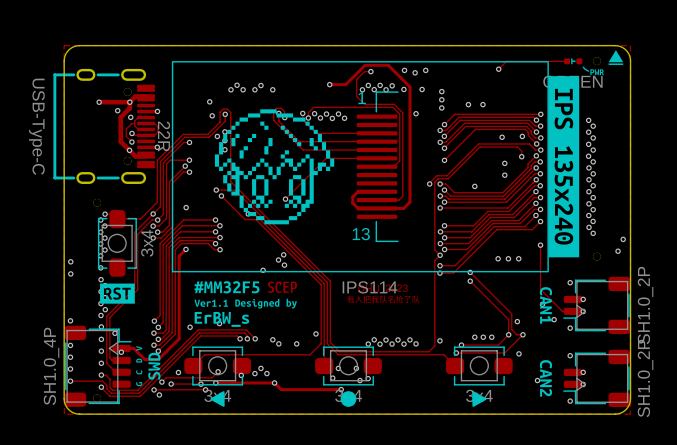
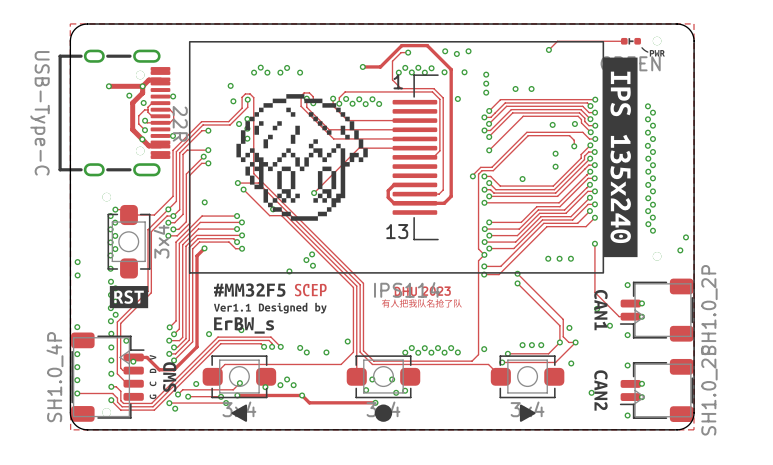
drawing: [608, 50, 624, 65] -> none

